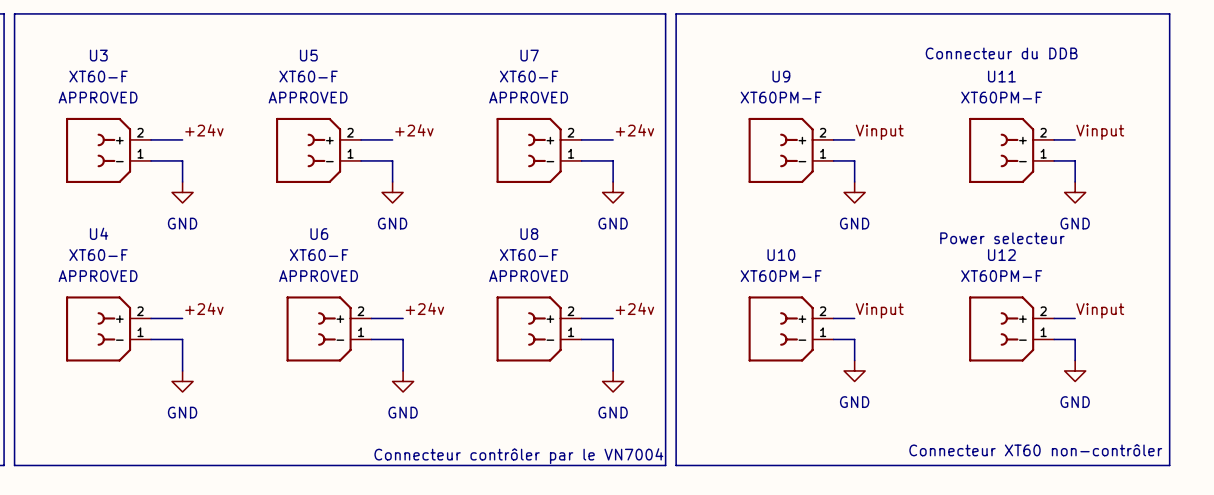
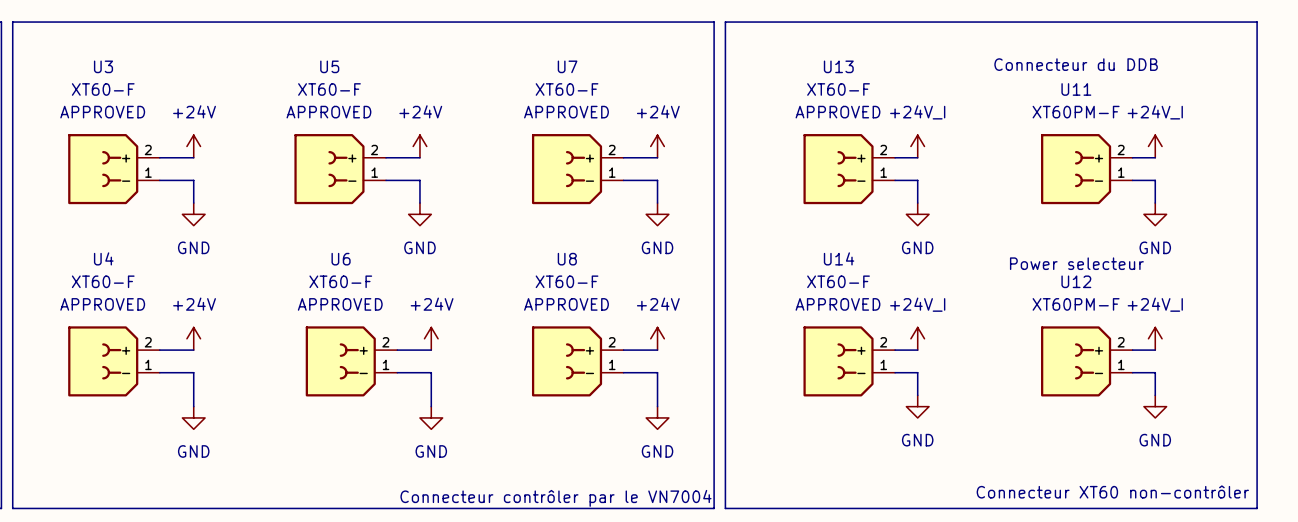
U3 symbol: [66, 117, 152, 184] -> [68, 134, 160, 205]
U5 symbol: [276, 117, 362, 184] -> [294, 134, 387, 205]
U7 symbol: [496, 117, 582, 184] -> [531, 134, 624, 205]
U11 symbol: [969, 117, 1055, 184] -> [1041, 134, 1133, 205]
power symbol: none -> +24V (193, 146)
power symbol: none -> +24V (419, 146)
power symbol: none -> +24V (657, 146)
power symbol: none -> +24V_I (917, 146)
power symbol: none -> +24V_I (1155, 146)
label: +24v (204, 130) -> none
label: +24v (414, 130) -> none
label: +24v (634, 130) -> none
label: Vinput (879, 132) -> none
label: Vinput (1100, 132) -> none
U9: XT60PM-F (791, 150) -> none
U13: none -> XT60-F (849, 169)
U4 symbol: [66, 296, 152, 362] -> [68, 326, 160, 397]
U6 symbol: [286, 296, 372, 362] -> [305, 326, 398, 397]
U8 symbol: [496, 296, 582, 362] -> [531, 326, 624, 397]
U12 symbol: [969, 296, 1055, 362] -> [1041, 326, 1133, 397]
power symbol: none -> +24V (193, 338)
power symbol: none -> +24V (431, 338)
power symbol: none -> +24V (657, 338)
power symbol: none -> +24V_I (917, 338)
power symbol: none -> +24V_I (1155, 338)
label: +24v (204, 308) -> none
label: +24v (424, 308) -> none
label: +24v (634, 308) -> none
label: Vinput (879, 310) -> none
label: Vinput (1100, 310) -> none
U10: XT60PM-F (791, 328) -> none
U14: none -> XT60-F (849, 361)

